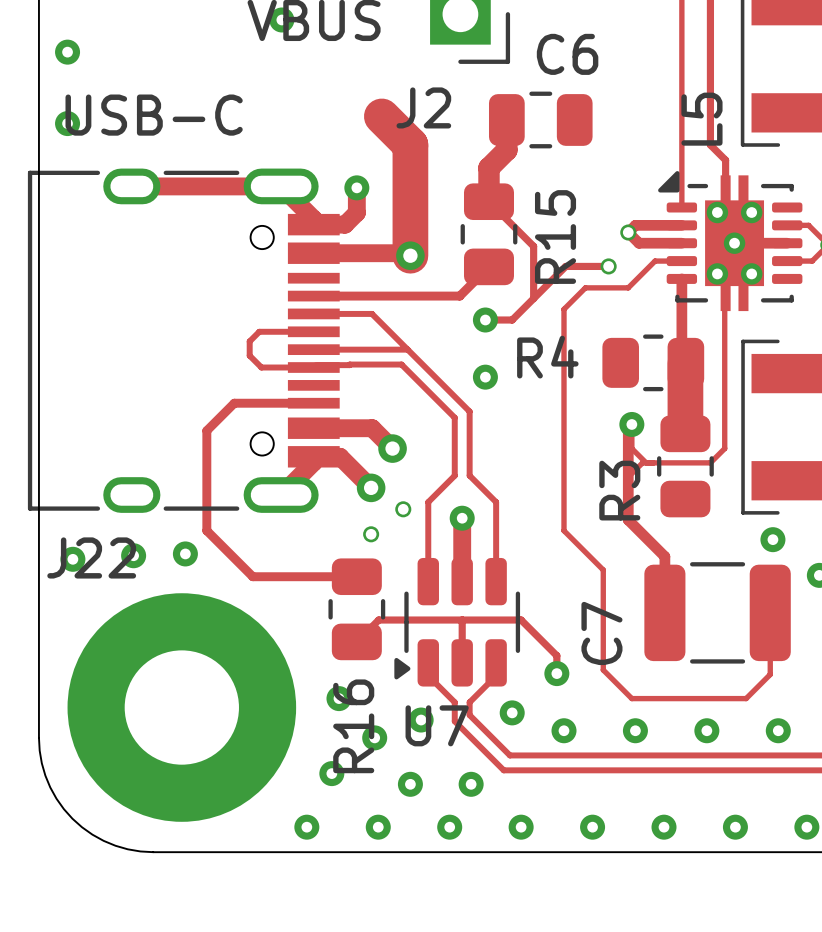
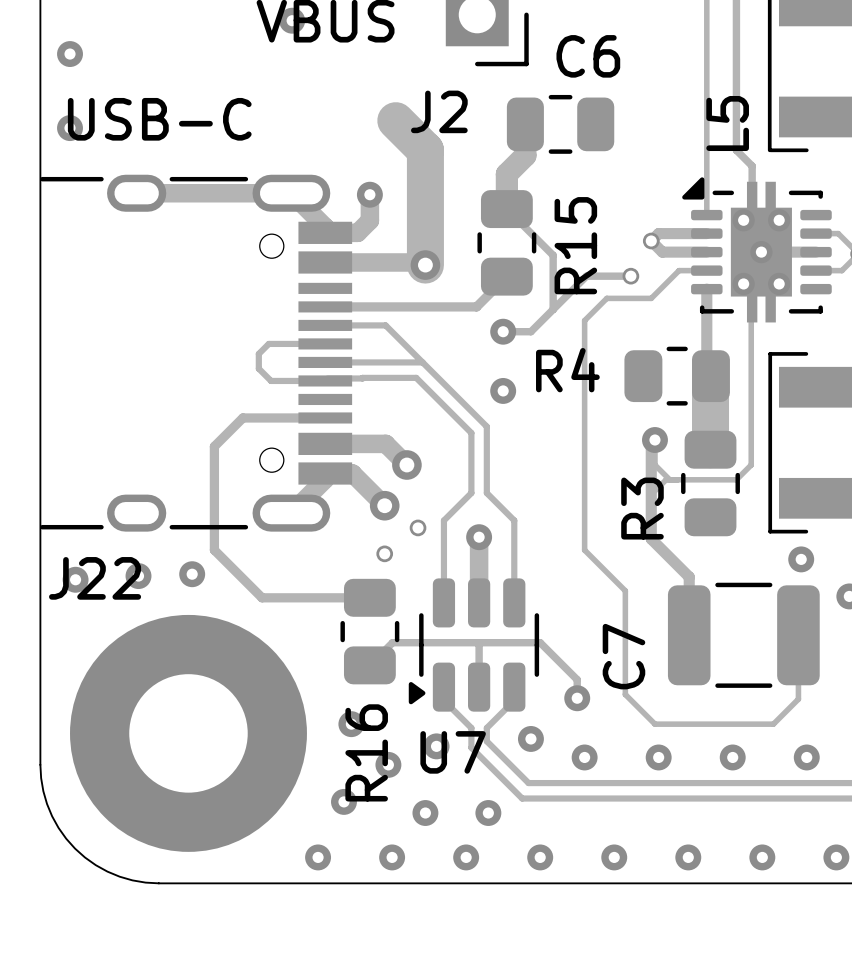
J22 footprint: [27, 168, 340, 513] -> [40, 174, 353, 532]

